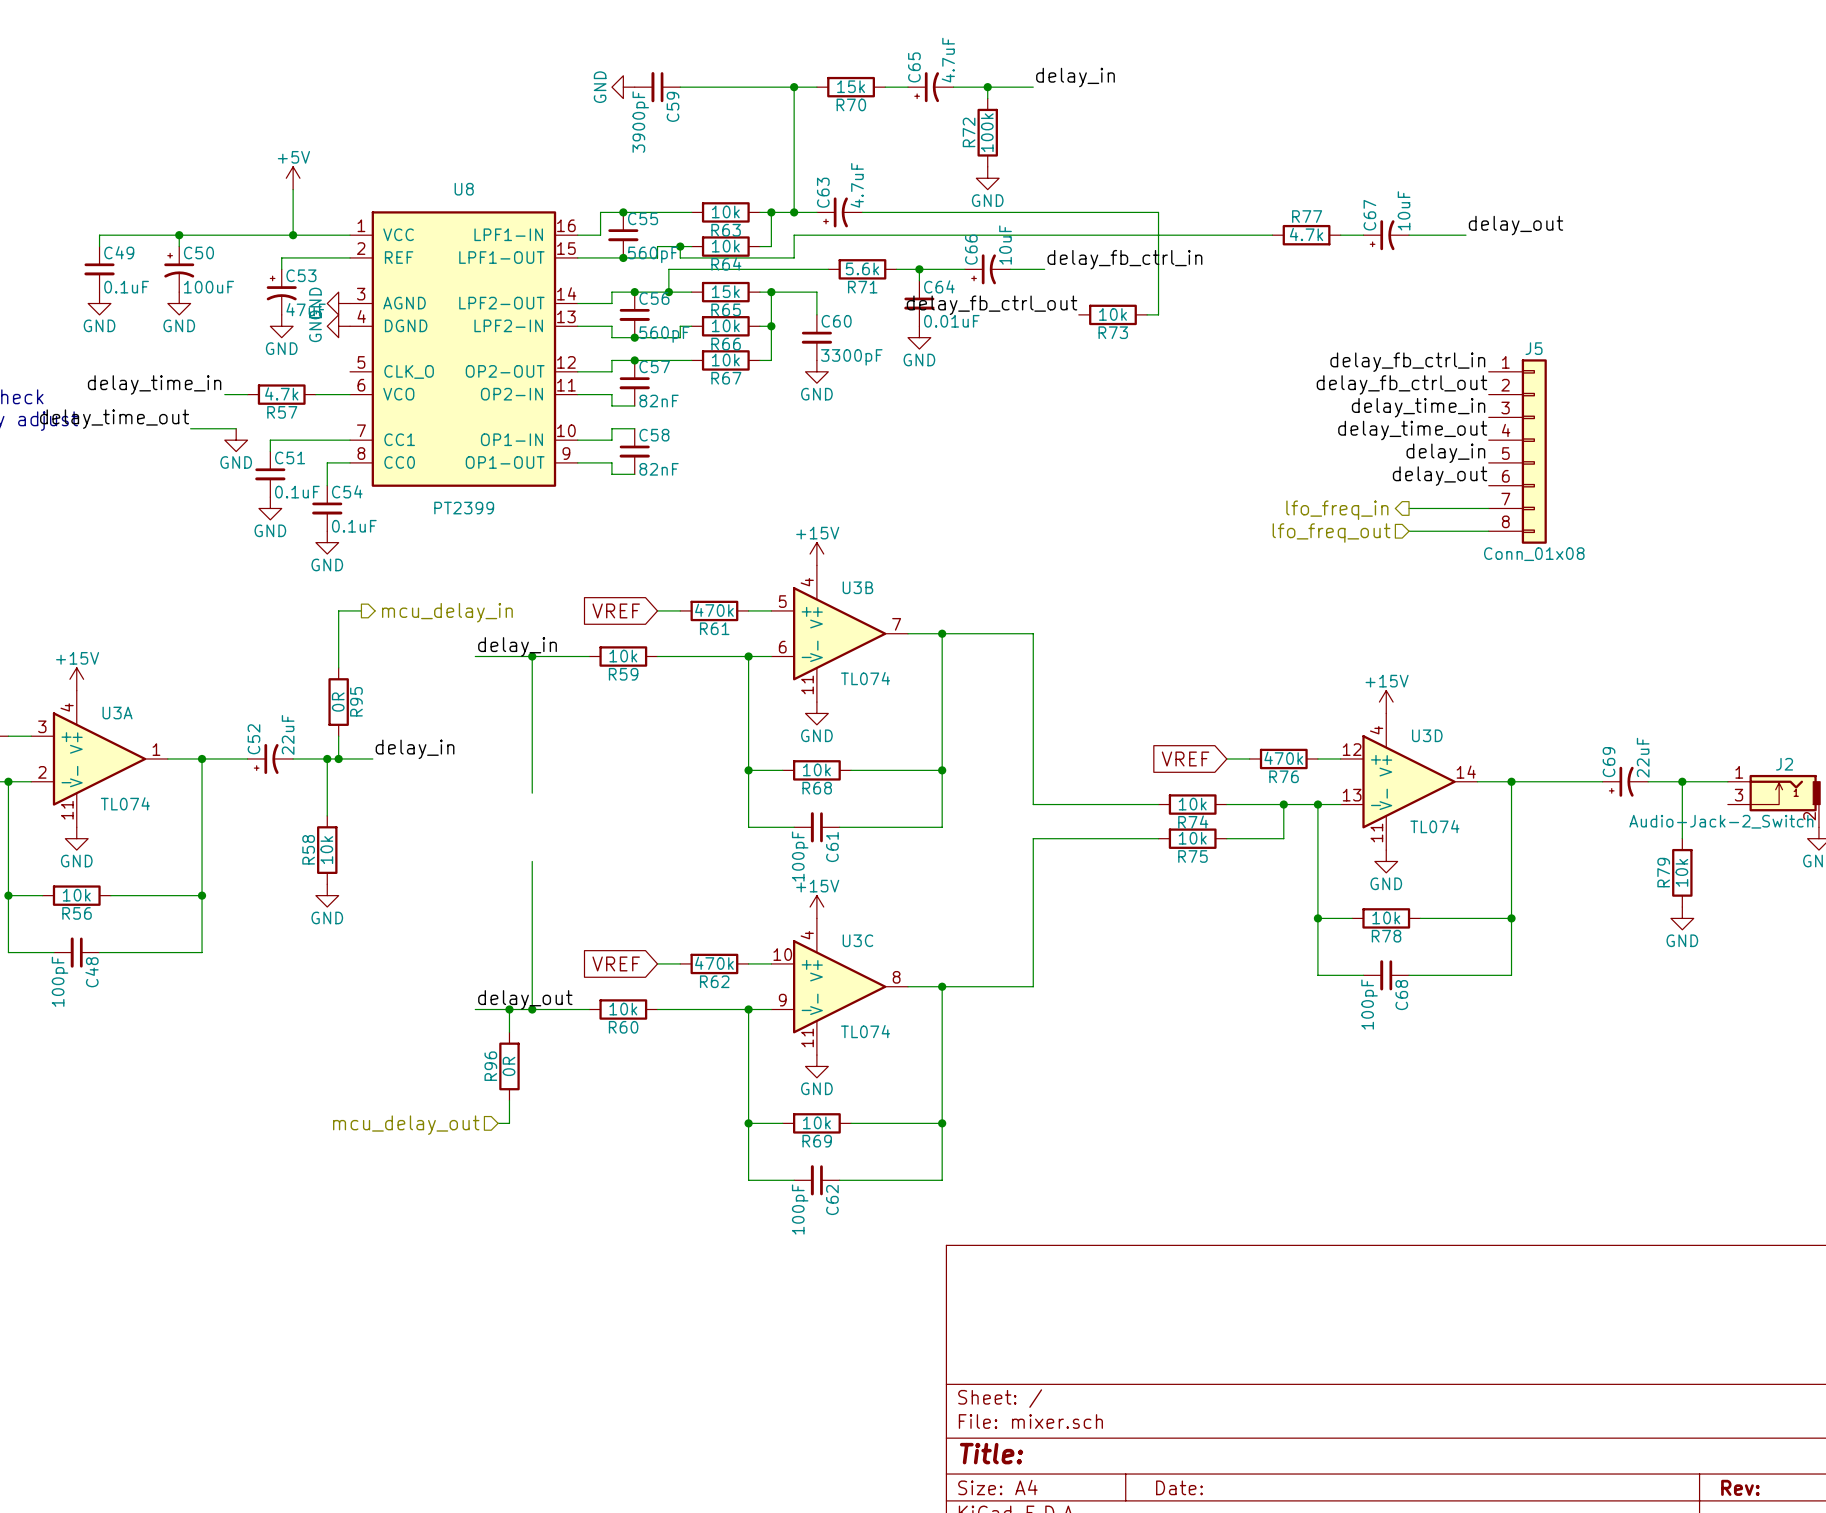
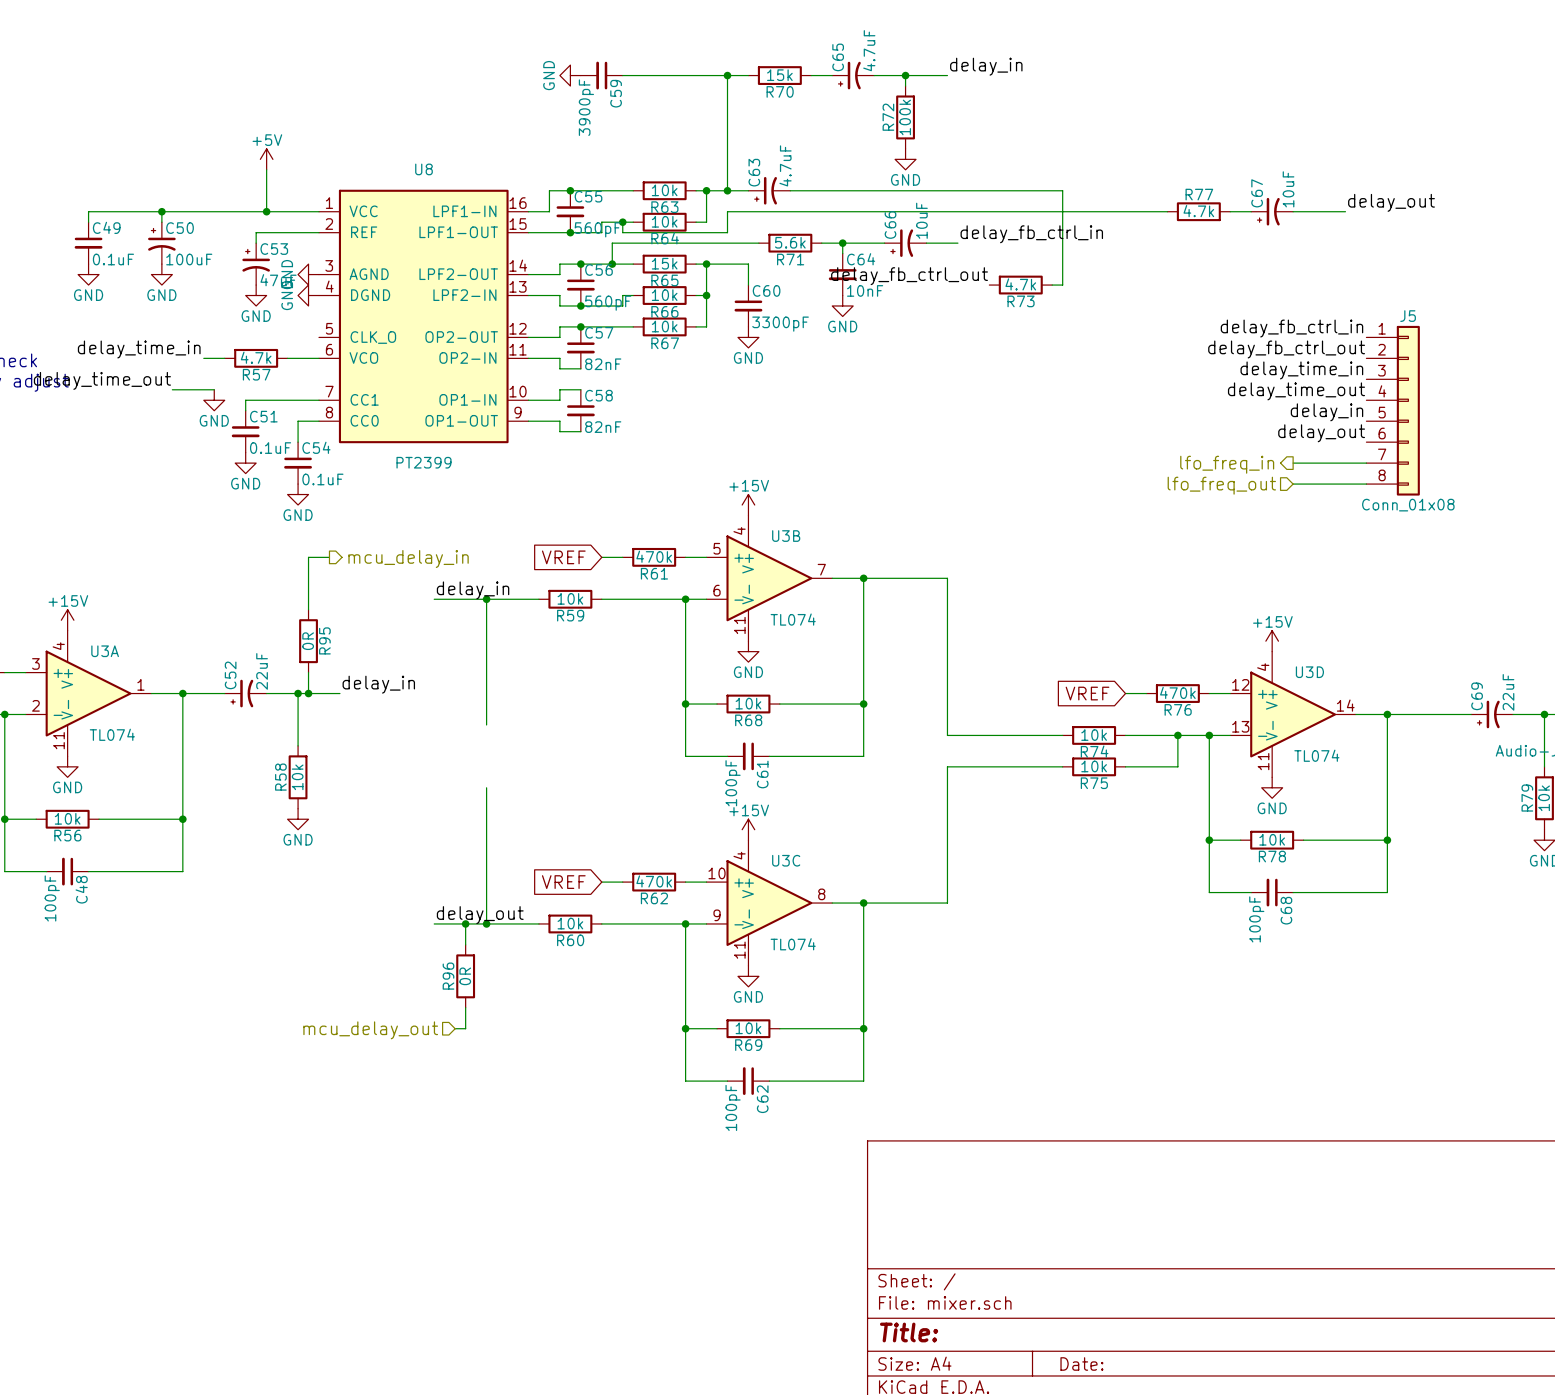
R73 value: 10k (1112, 314) -> 4.7k (1020, 284)
C64 value: 0.01uF (951, 321) -> 10nF (865, 290)

